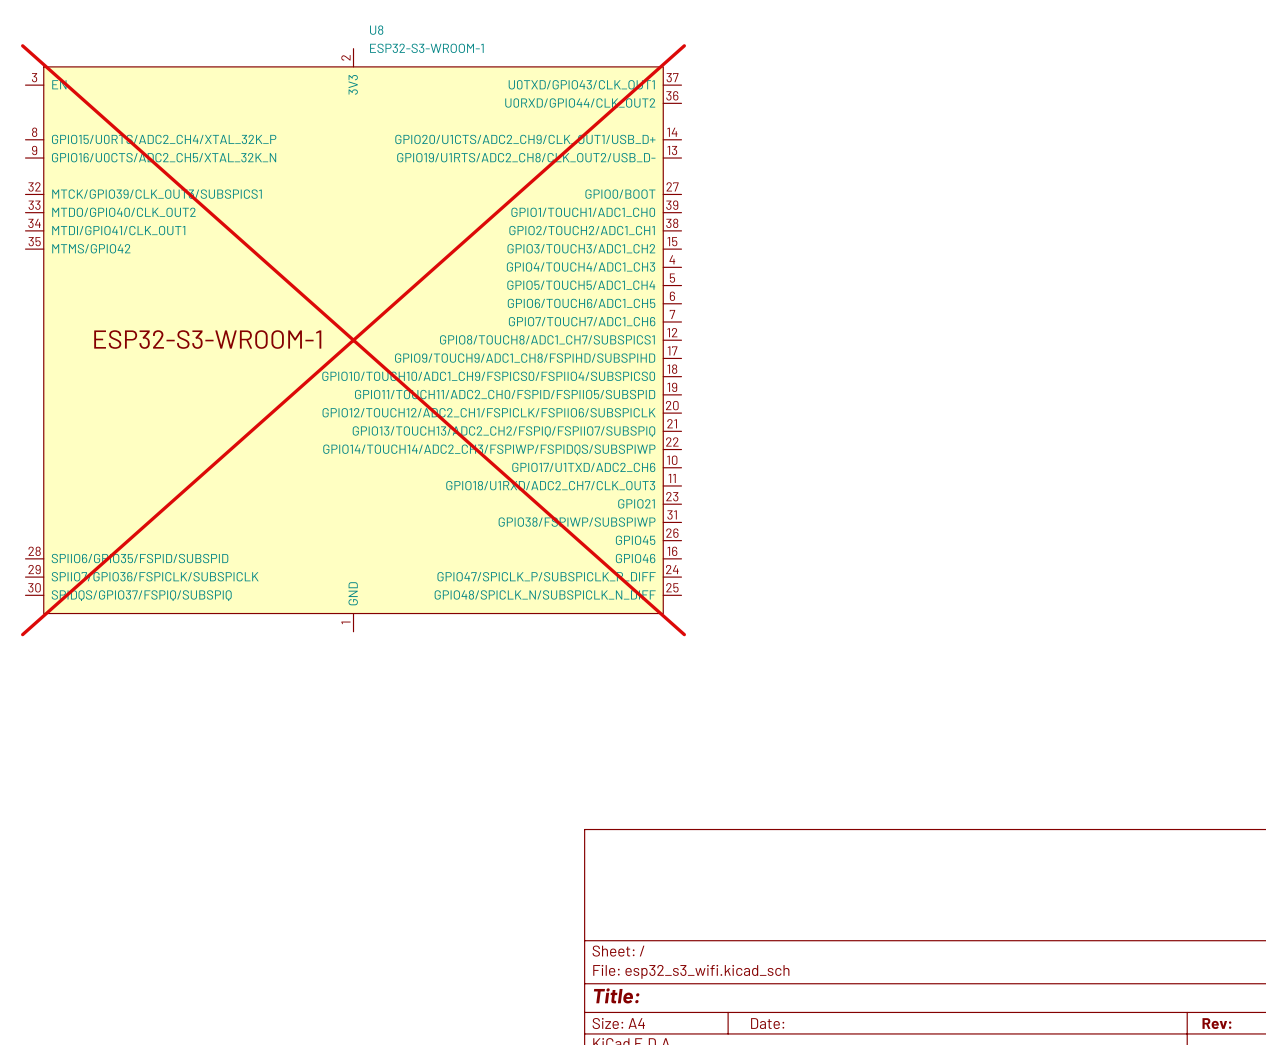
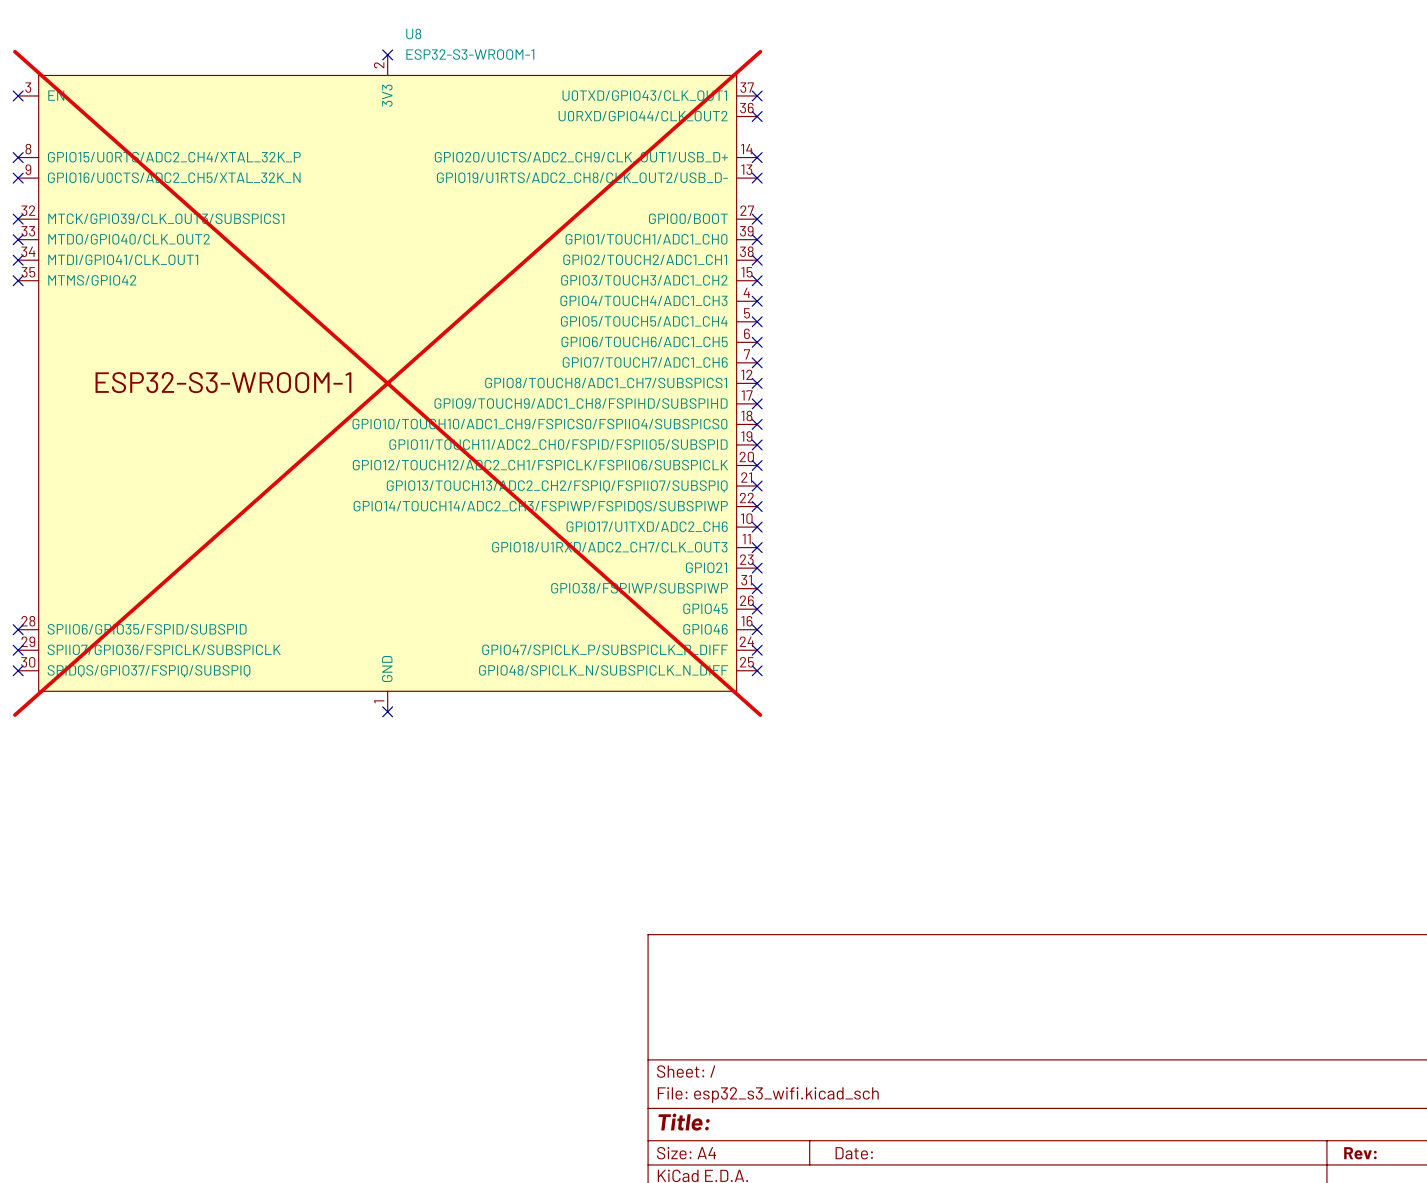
no-connect mark: none -> (387, 54)
no-connect mark: none -> (18, 95)
no-connect mark: none -> (757, 95)
no-connect mark: none -> (757, 116)
no-connect mark: none -> (18, 157)
no-connect mark: none -> (757, 157)
no-connect mark: none -> (18, 178)
no-connect mark: none -> (757, 178)
no-connect mark: none -> (18, 219)
no-connect mark: none -> (757, 219)
no-connect mark: none -> (18, 239)
no-connect mark: none -> (757, 239)
no-connect mark: none -> (18, 260)
no-connect mark: none -> (757, 260)
no-connect mark: none -> (18, 280)
no-connect mark: none -> (757, 280)
no-connect mark: none -> (757, 301)
no-connect mark: none -> (757, 321)
no-connect mark: none -> (757, 342)
no-connect mark: none -> (757, 362)
no-connect mark: none -> (757, 383)
no-connect mark: none -> (757, 403)
no-connect mark: none -> (757, 424)
no-connect mark: none -> (757, 444)
no-connect mark: none -> (757, 465)
no-connect mark: none -> (757, 486)
no-connect mark: none -> (757, 506)
no-connect mark: none -> (757, 527)
no-connect mark: none -> (757, 547)
no-connect mark: none -> (757, 568)
no-connect mark: none -> (757, 588)
no-connect mark: none -> (757, 609)
no-connect mark: none -> (18, 629)
no-connect mark: none -> (757, 629)
no-connect mark: none -> (18, 650)
no-connect mark: none -> (757, 650)
no-connect mark: none -> (18, 670)
no-connect mark: none -> (757, 670)
no-connect mark: none -> (387, 711)

